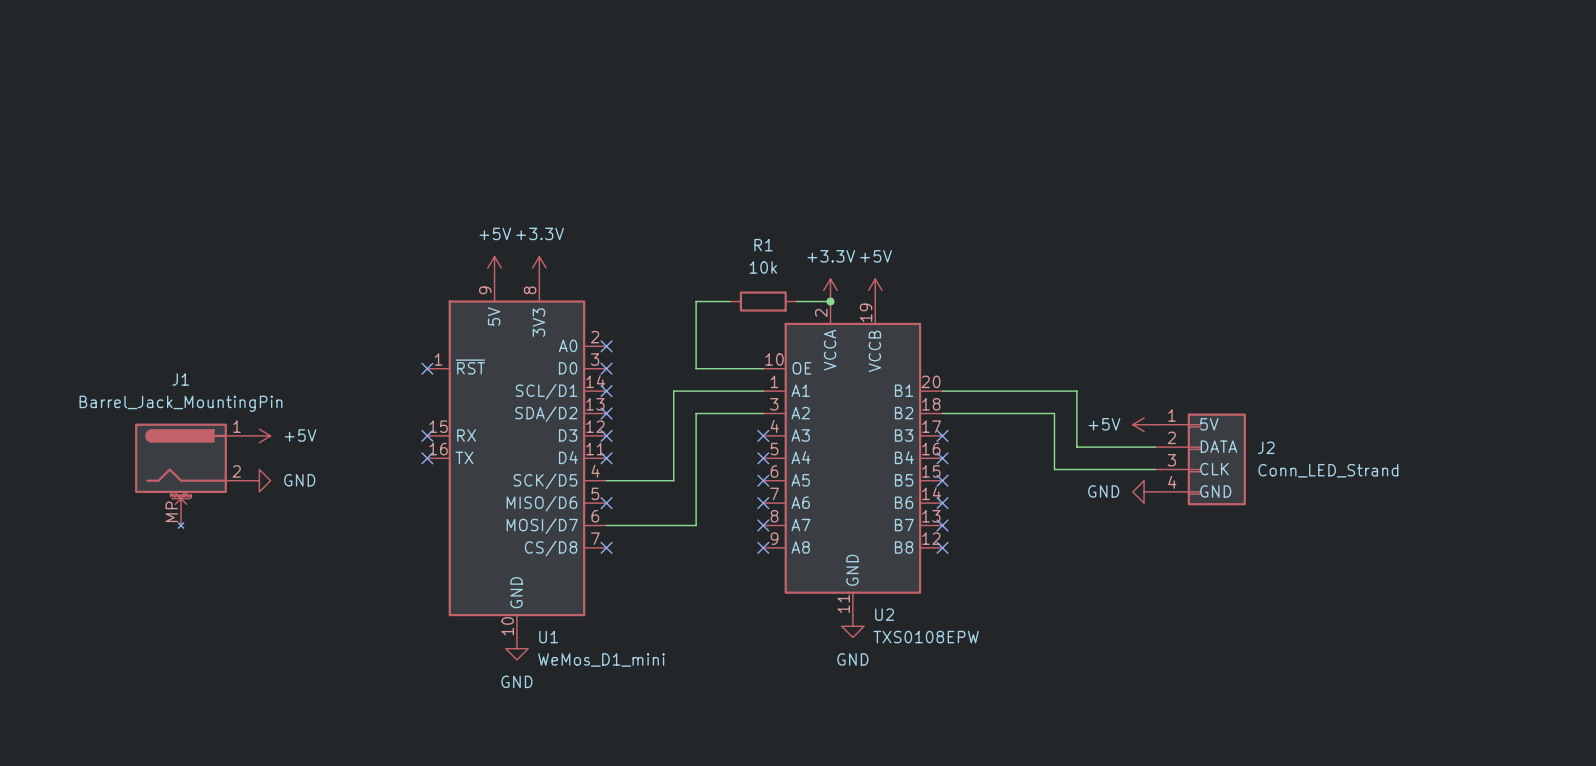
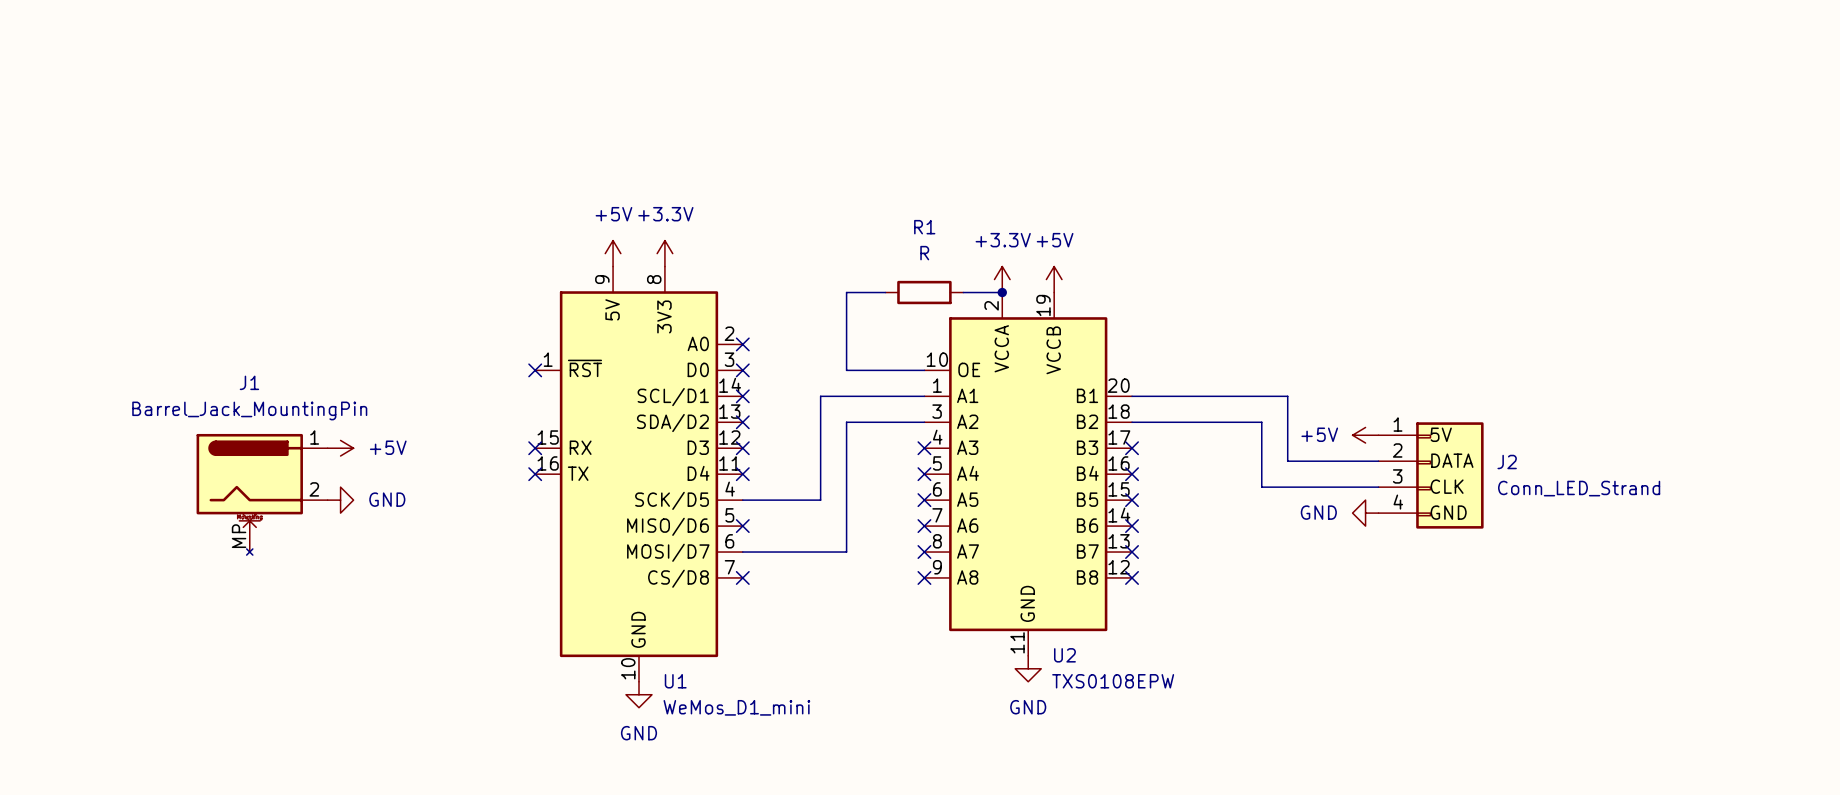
R1 value: 10k (763, 267) -> R (924, 253)

